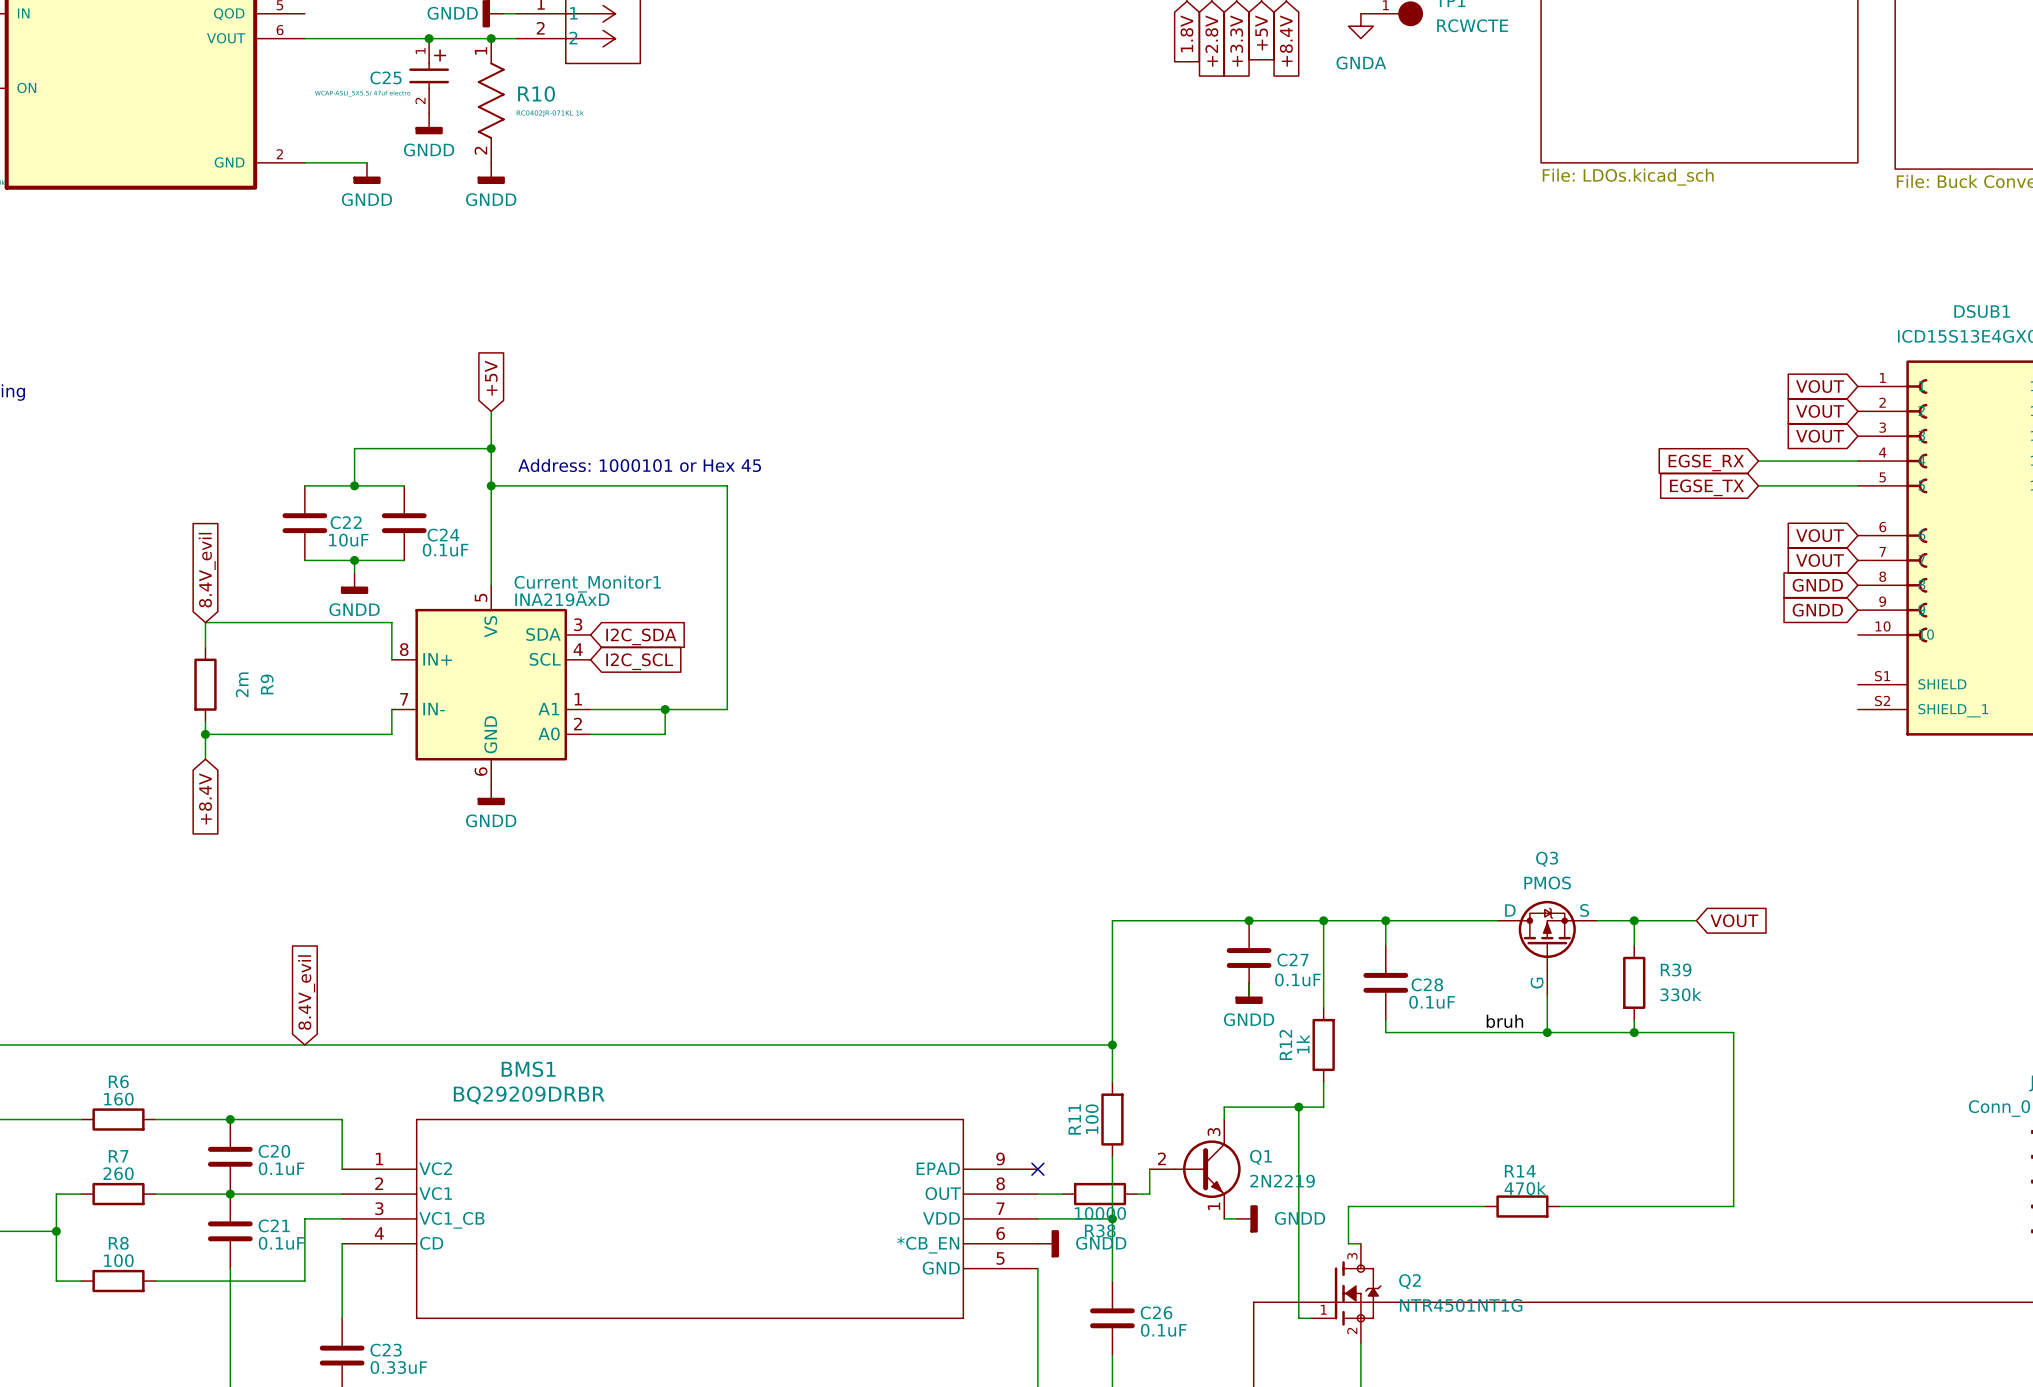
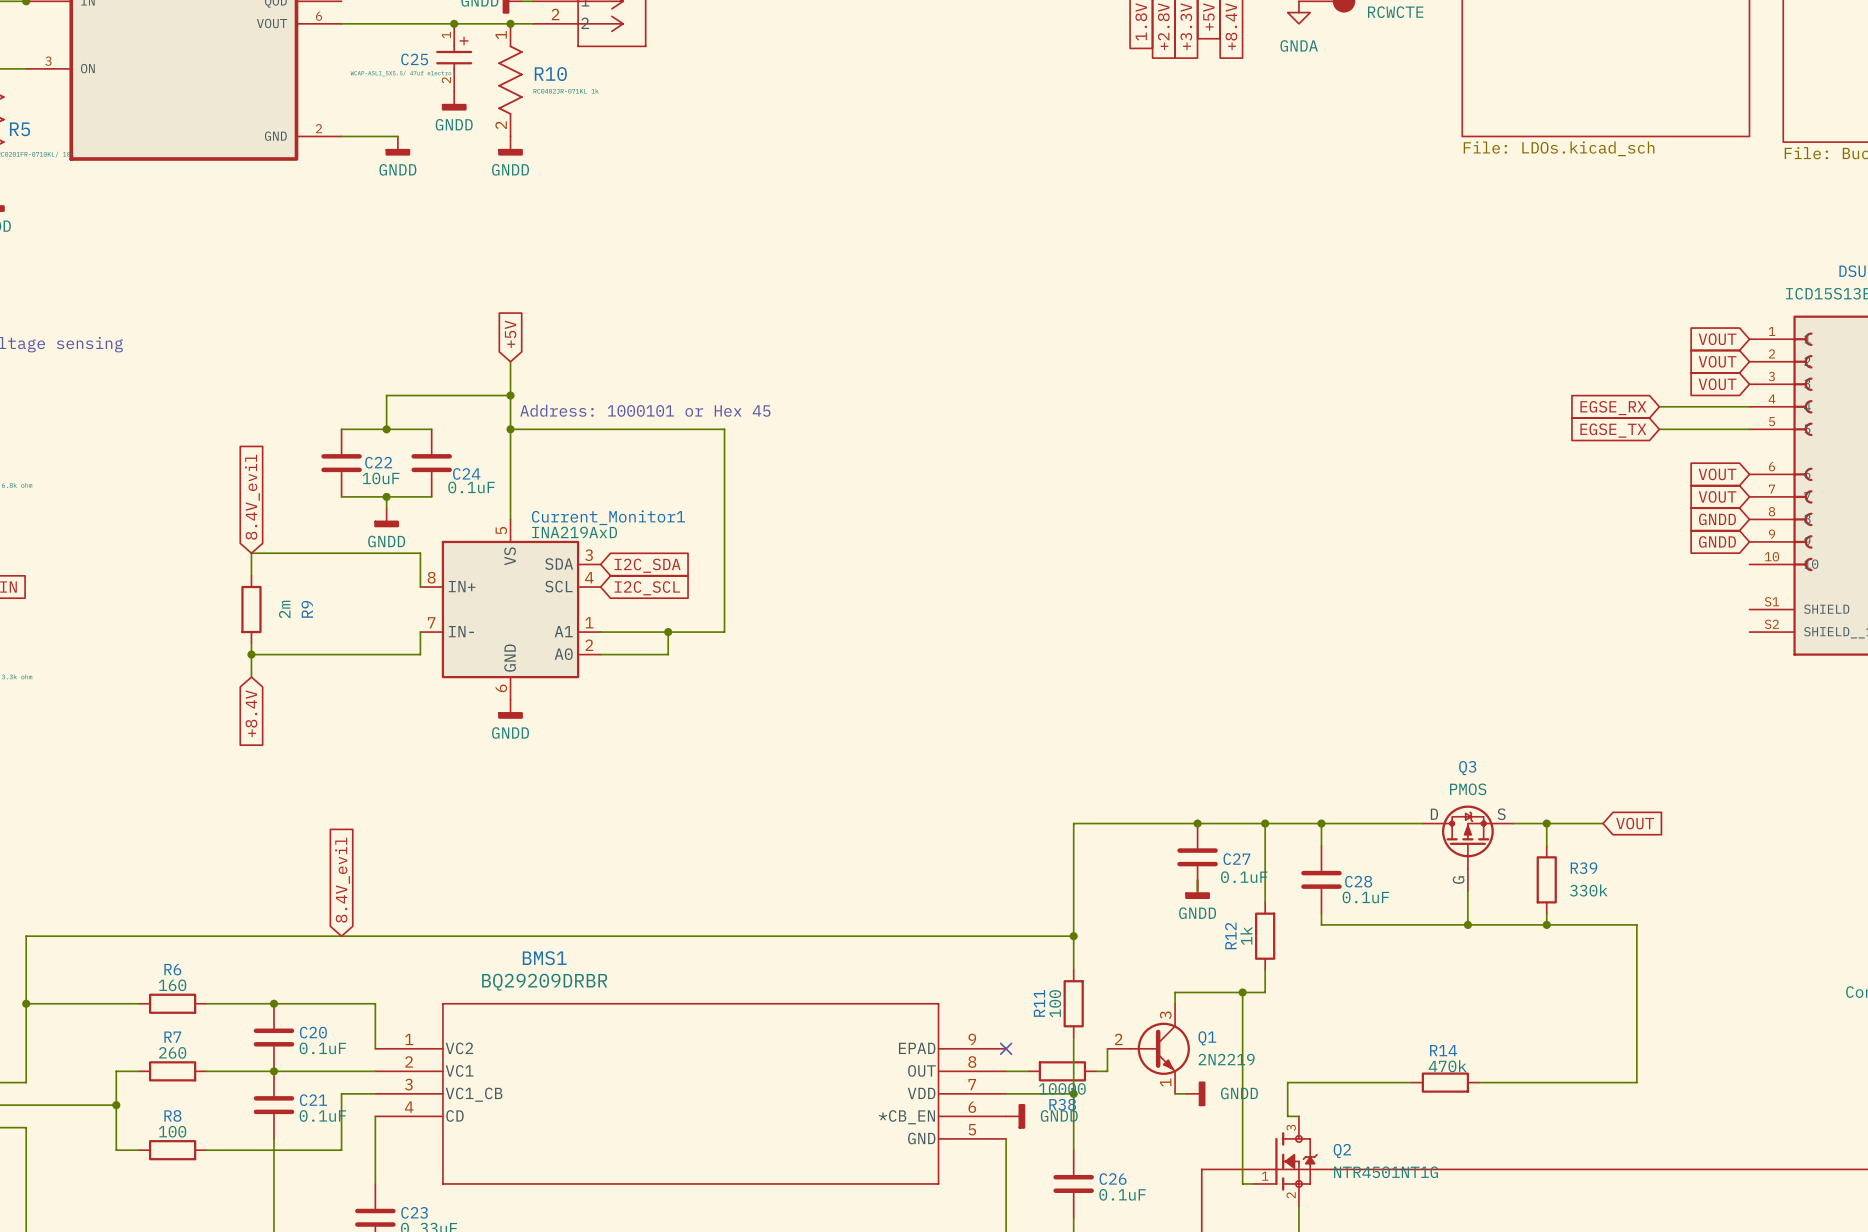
label: bruh (1504, 1021) -> none

